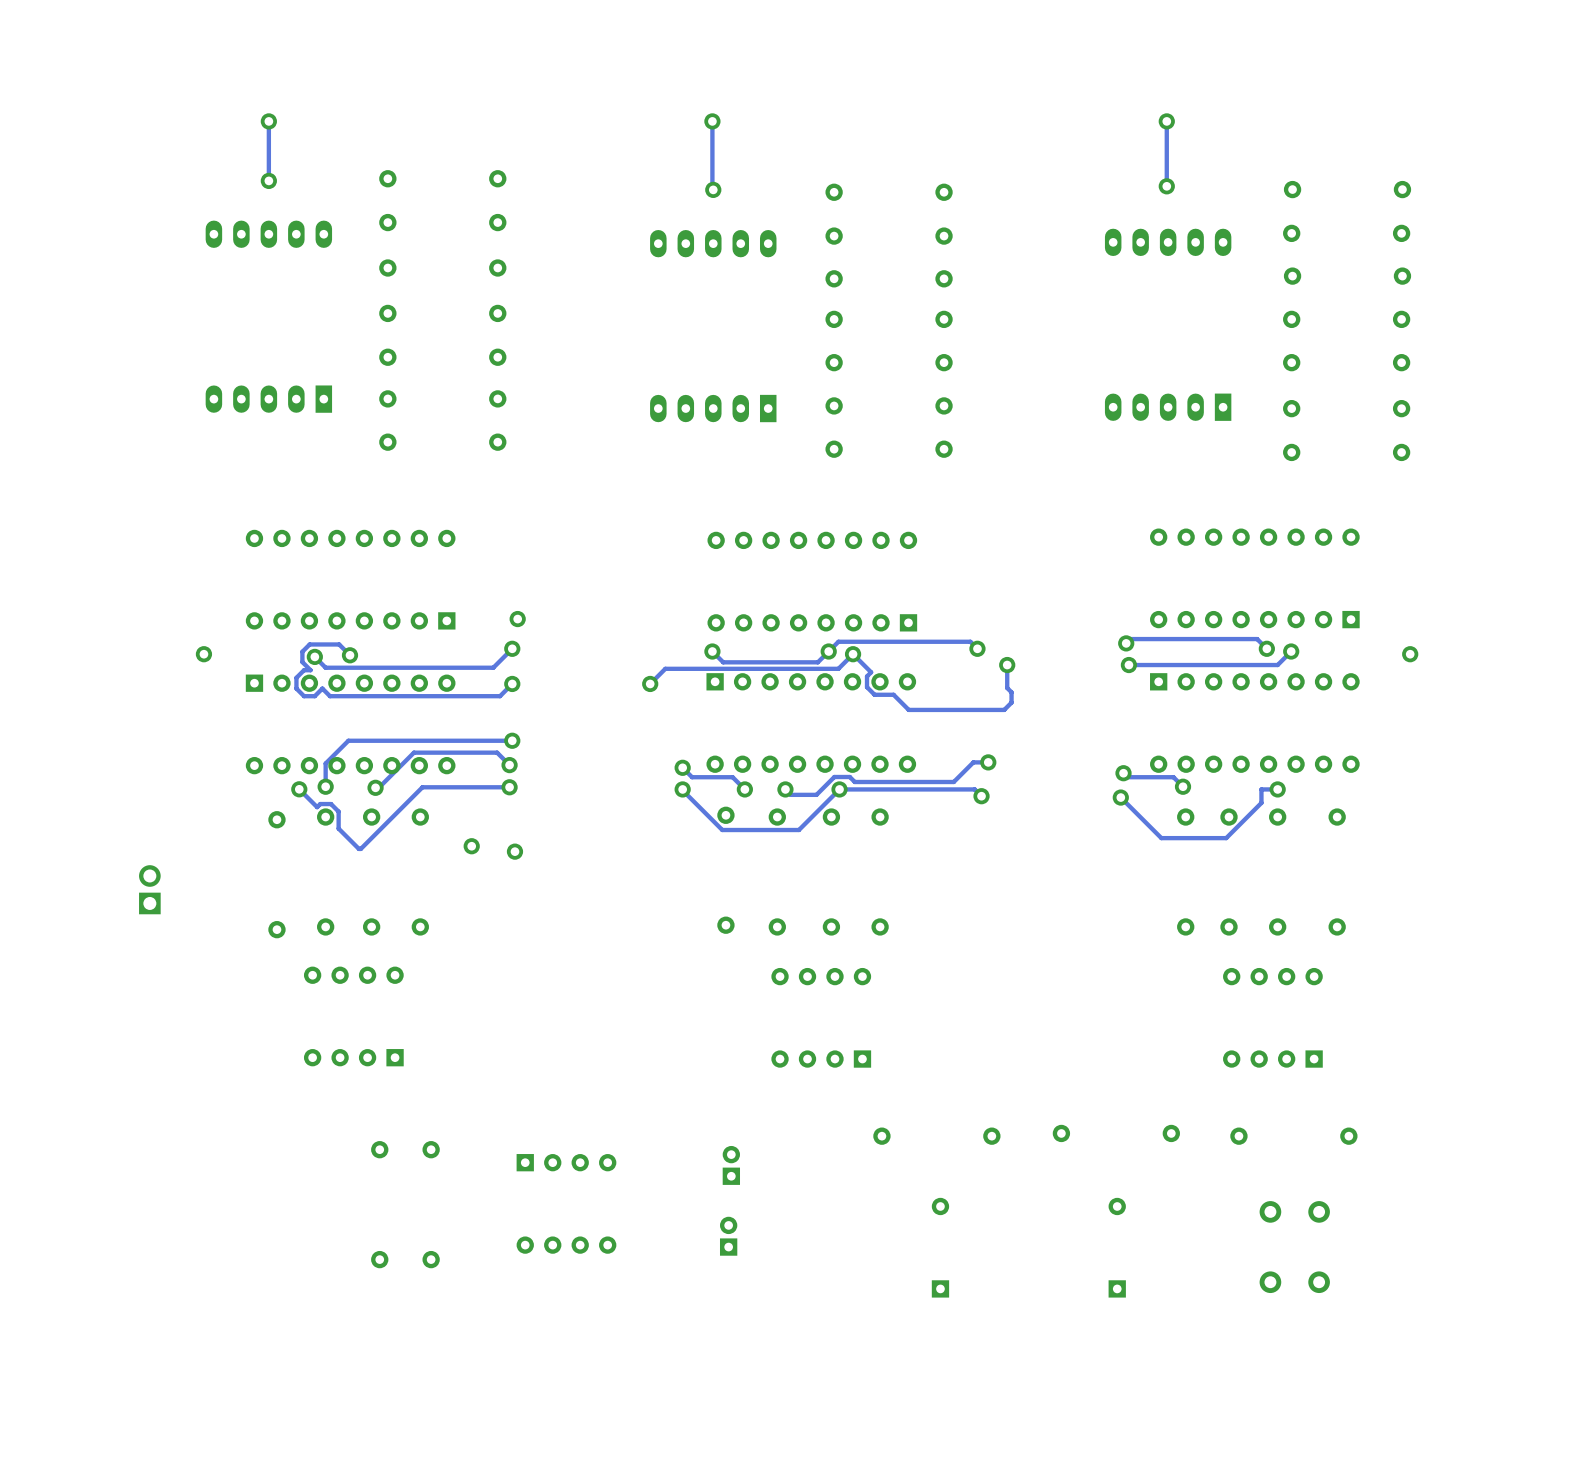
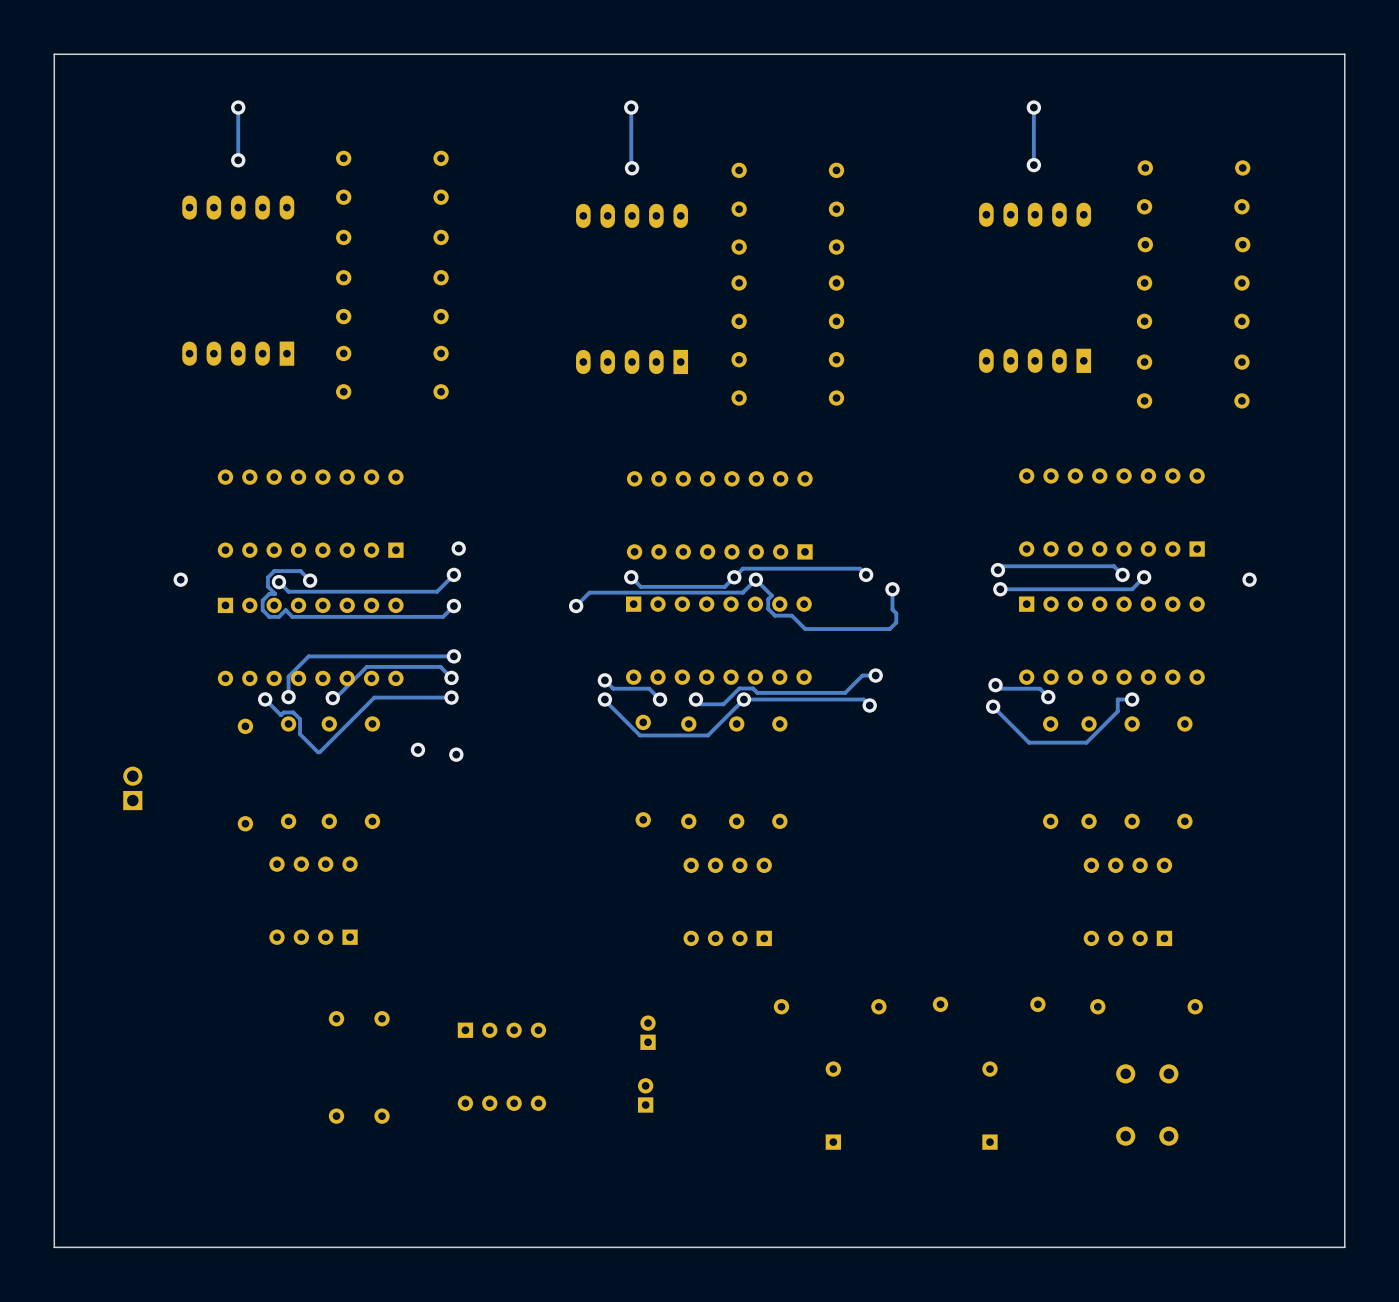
board edge: none -> (1344, 54) (54, 54) (54, 1247) (1344, 1247) (1344, 54)

